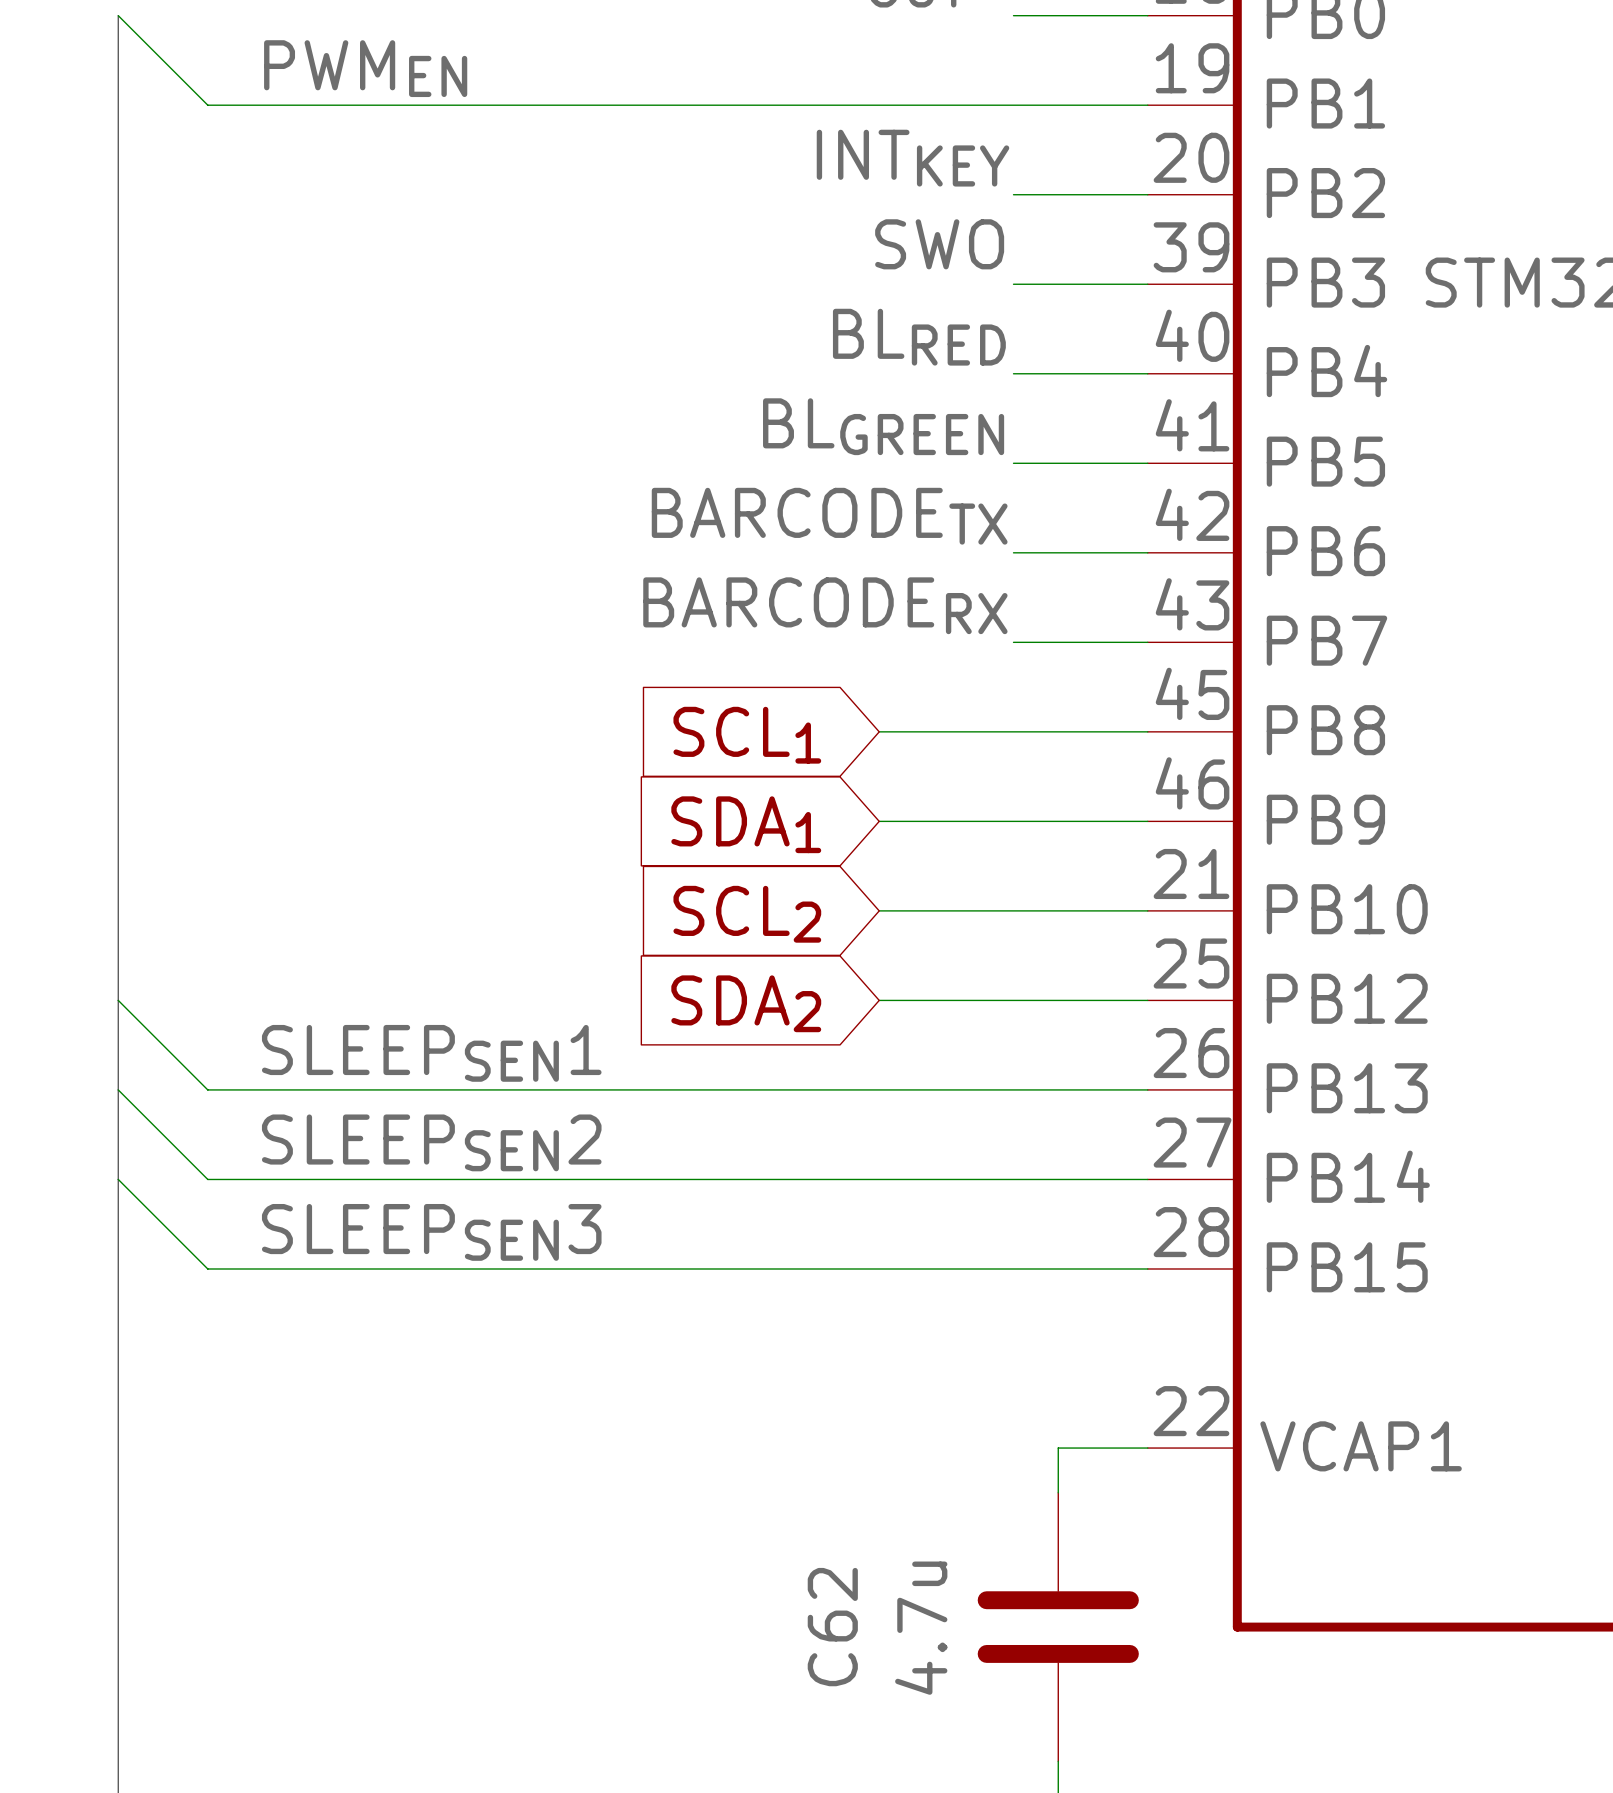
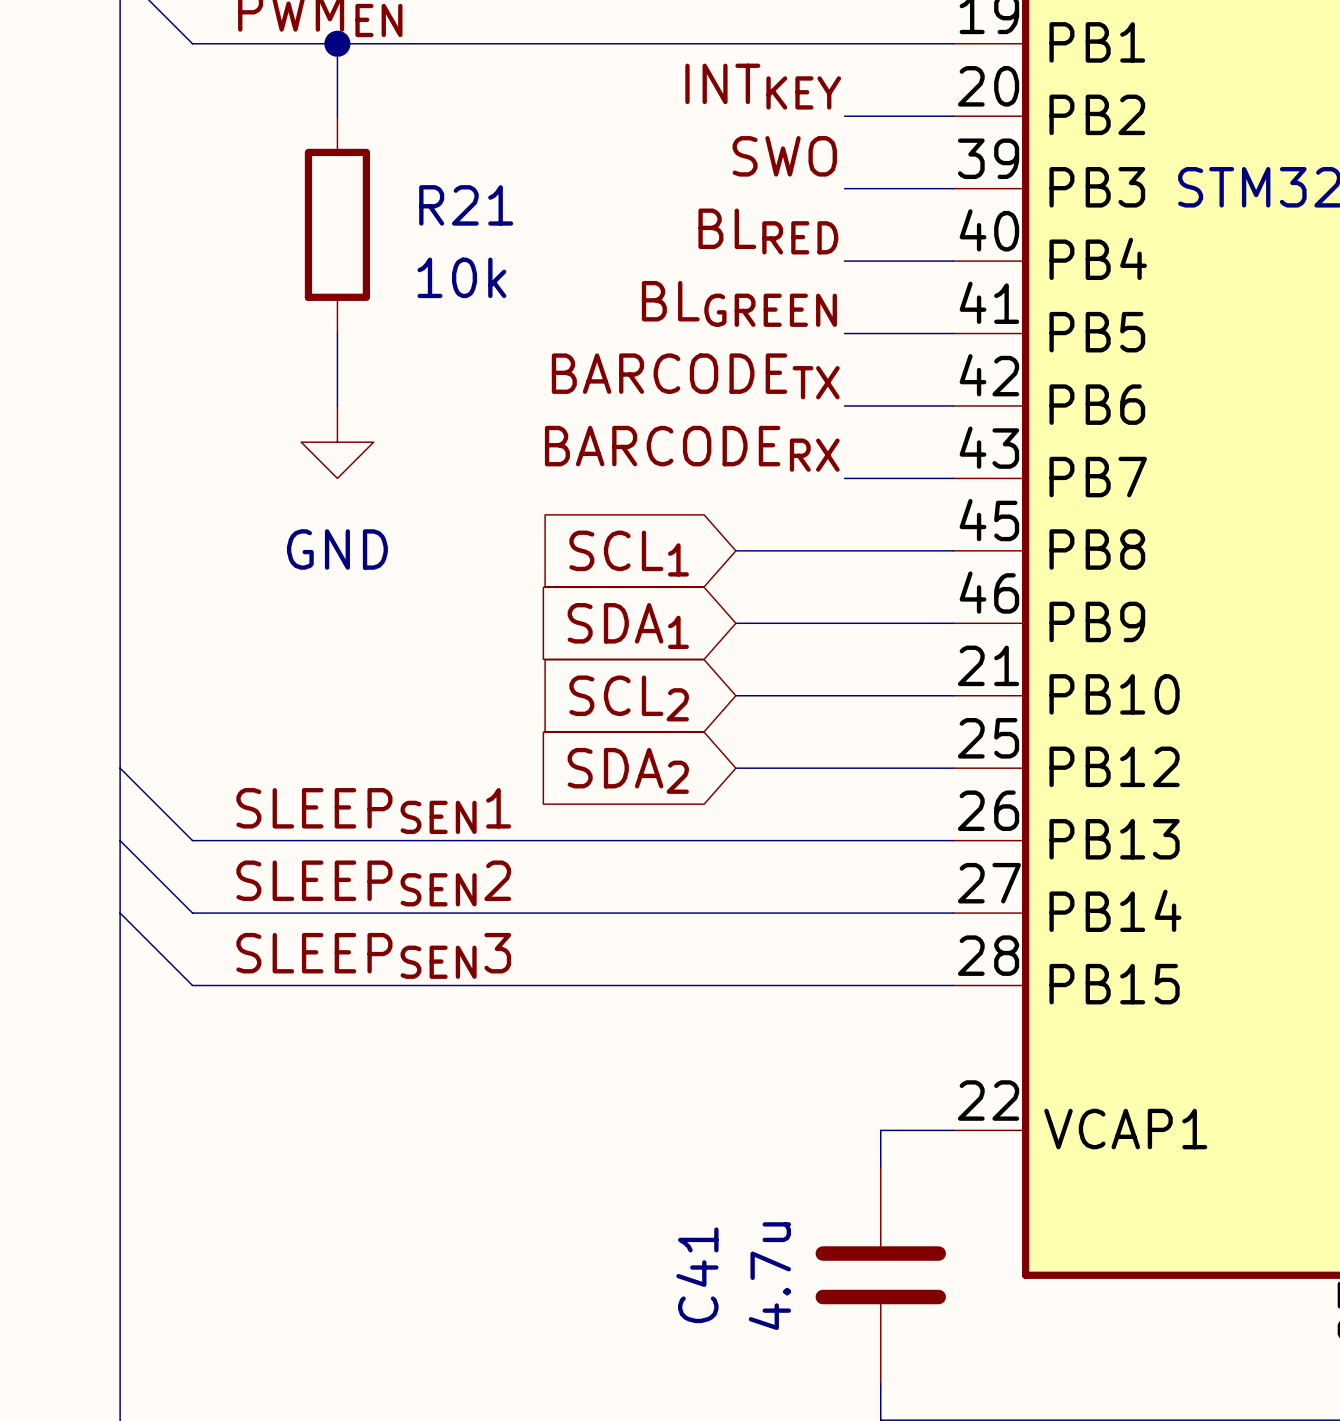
wire: none -> (337, 43) (337, 116)
junction: none -> (337, 43)
R21: none -> 10k (337, 224)
wire: none -> (337, 333) (337, 405)
power symbol: none -> GND (337, 442)
C62 name: C62 (832, 1627) -> C41 (697, 1275)

